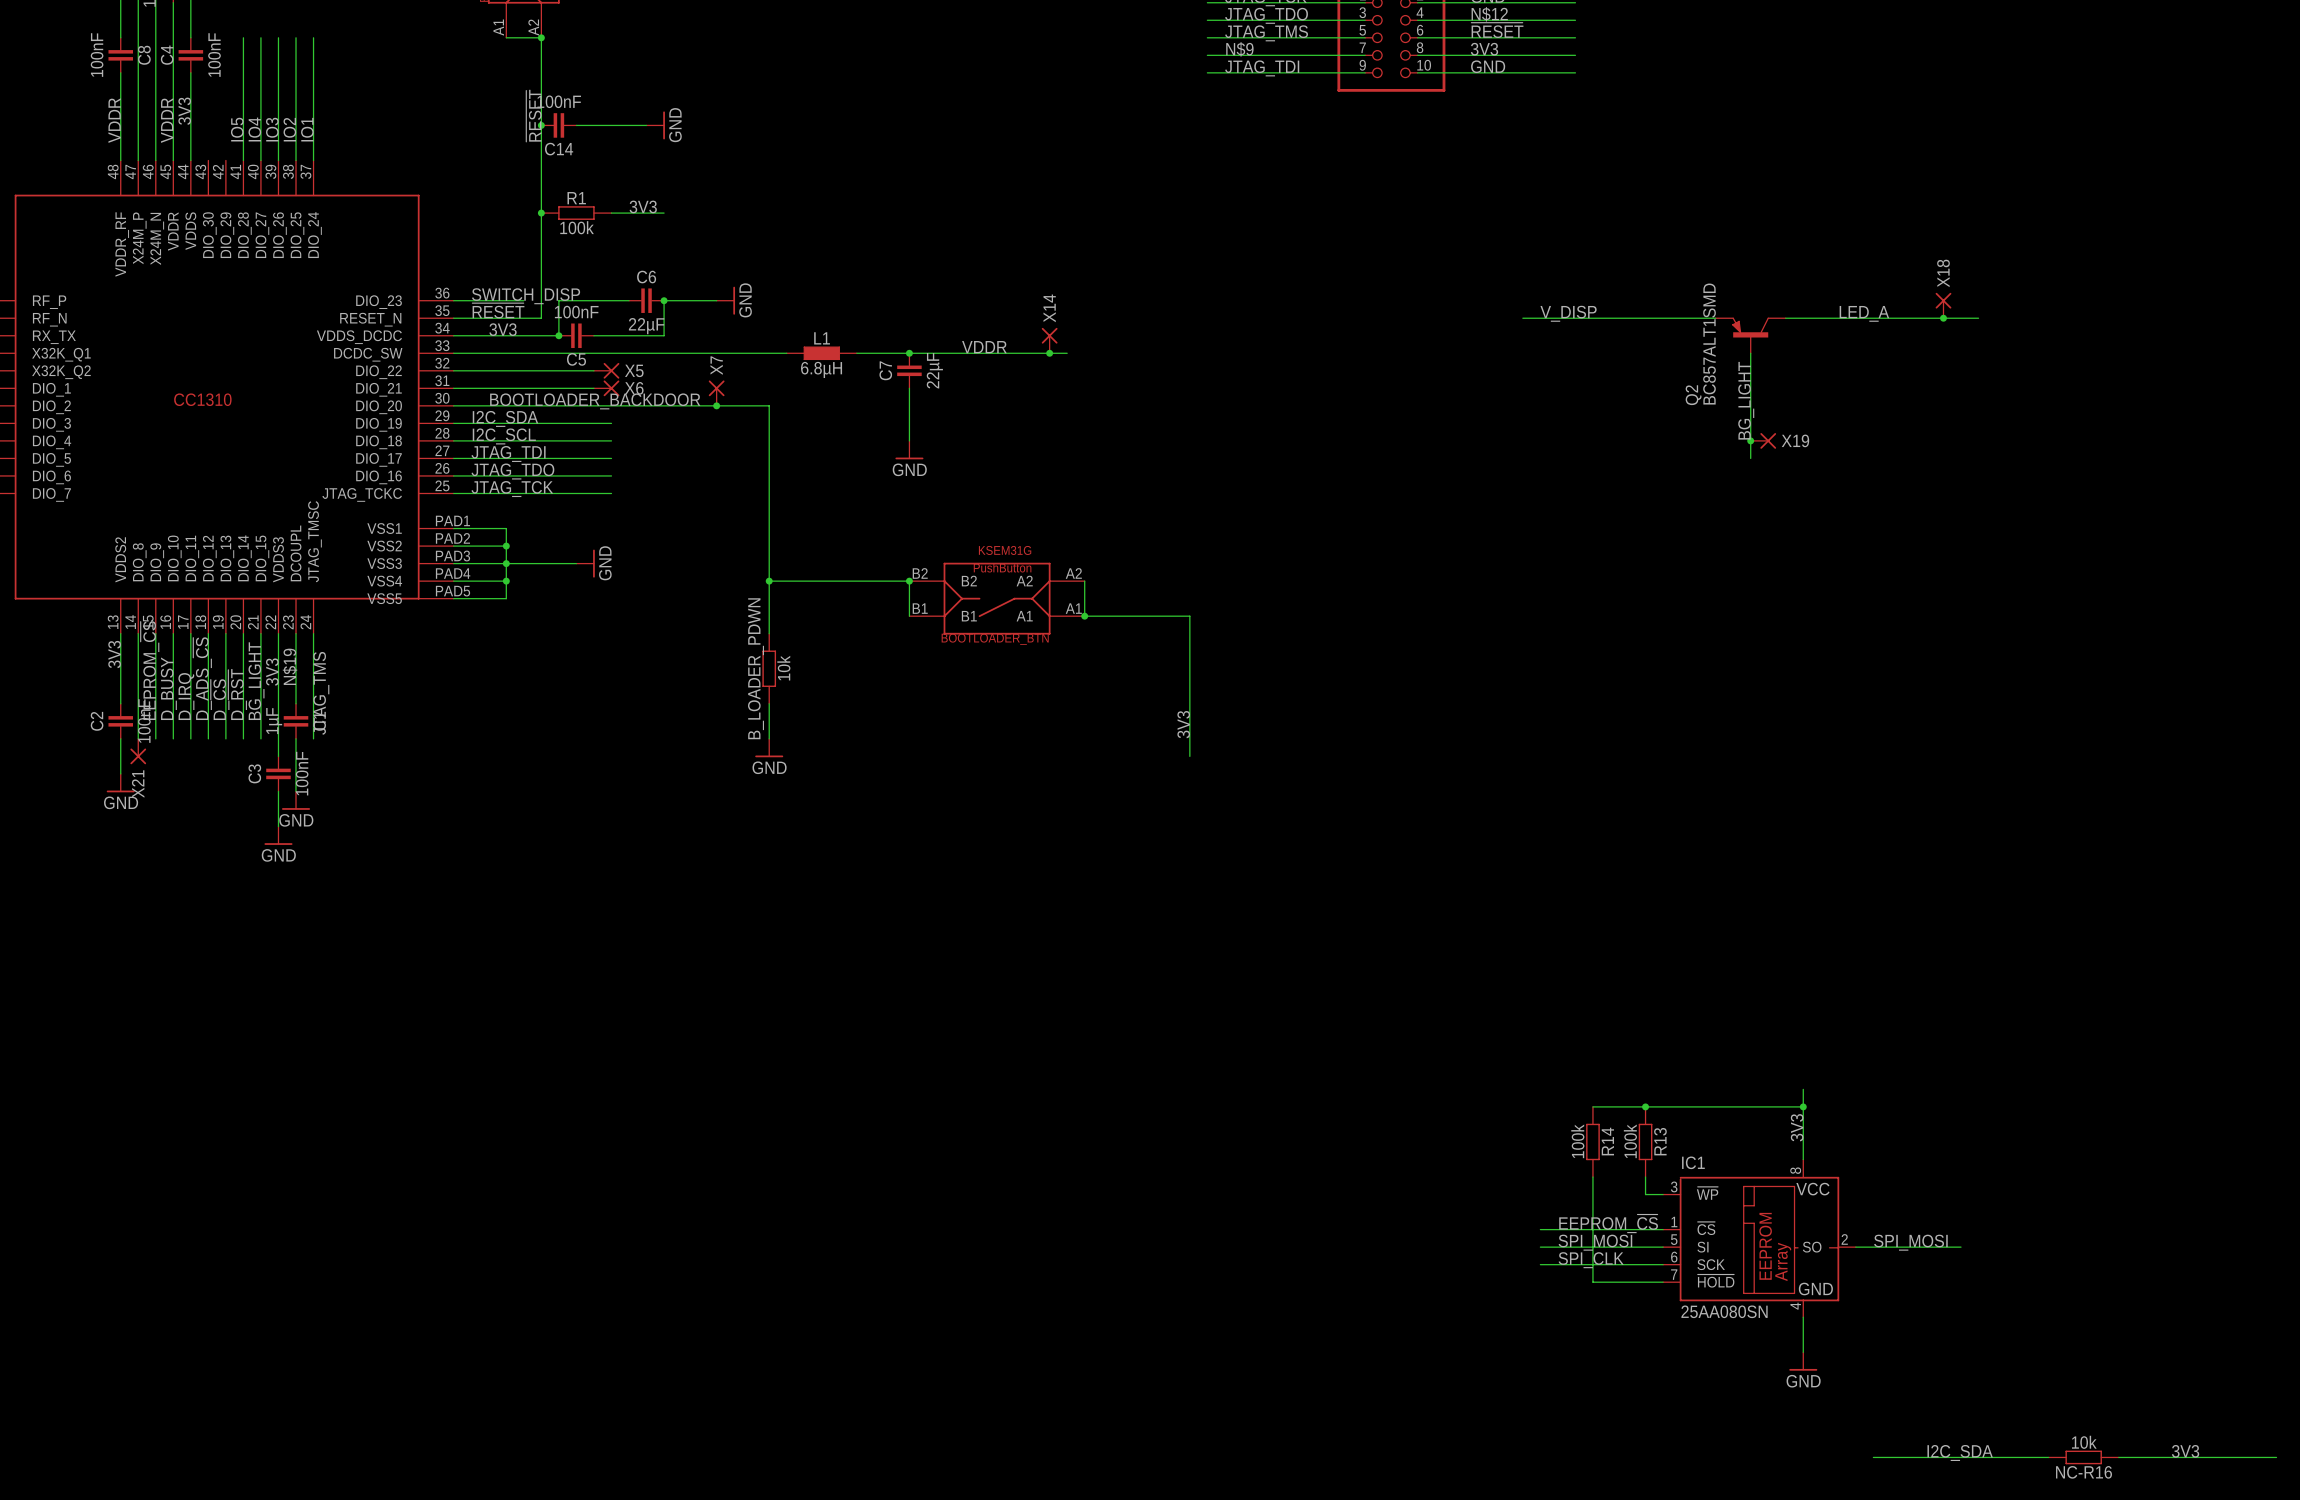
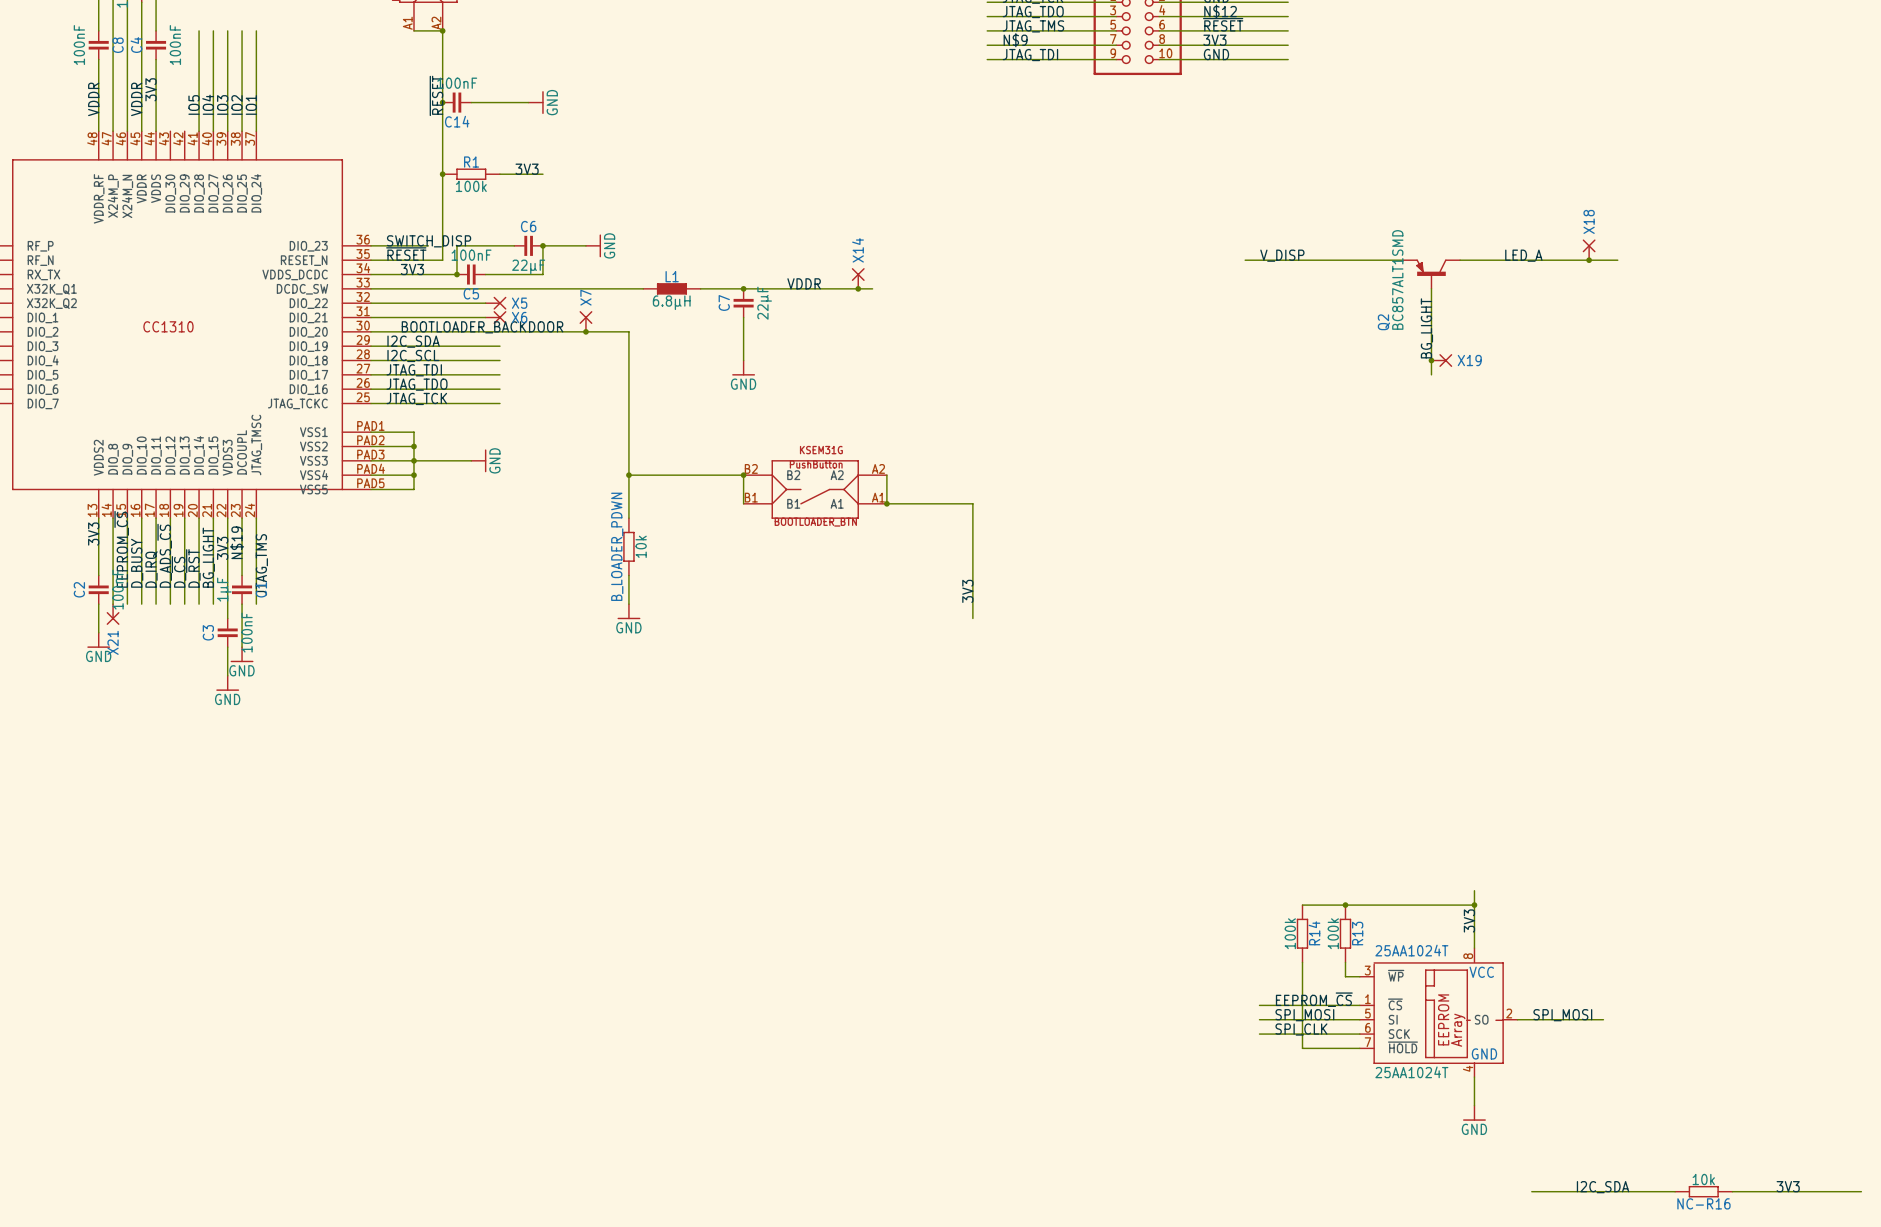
IC1 name: IC1 (1693, 1162) -> 25AA1024T (1411, 950)
IC1 value: 25AA080SN (1724, 1311) -> 25AA1024T (1411, 1072)

